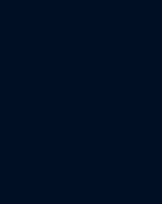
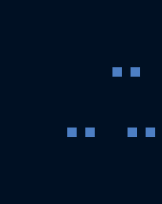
part: none -> (126, 71)
part: none -> (80, 132)
part: none -> (141, 132)

